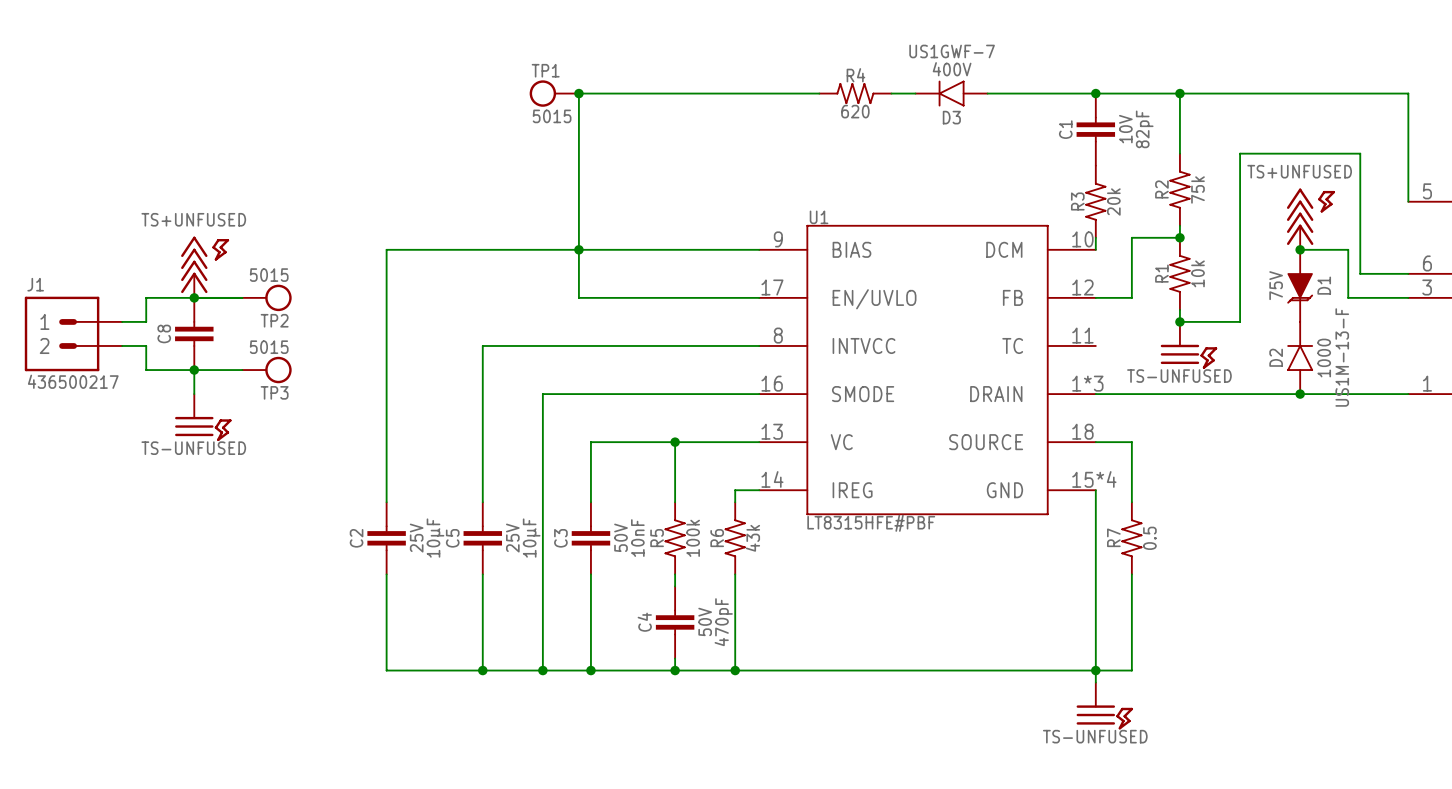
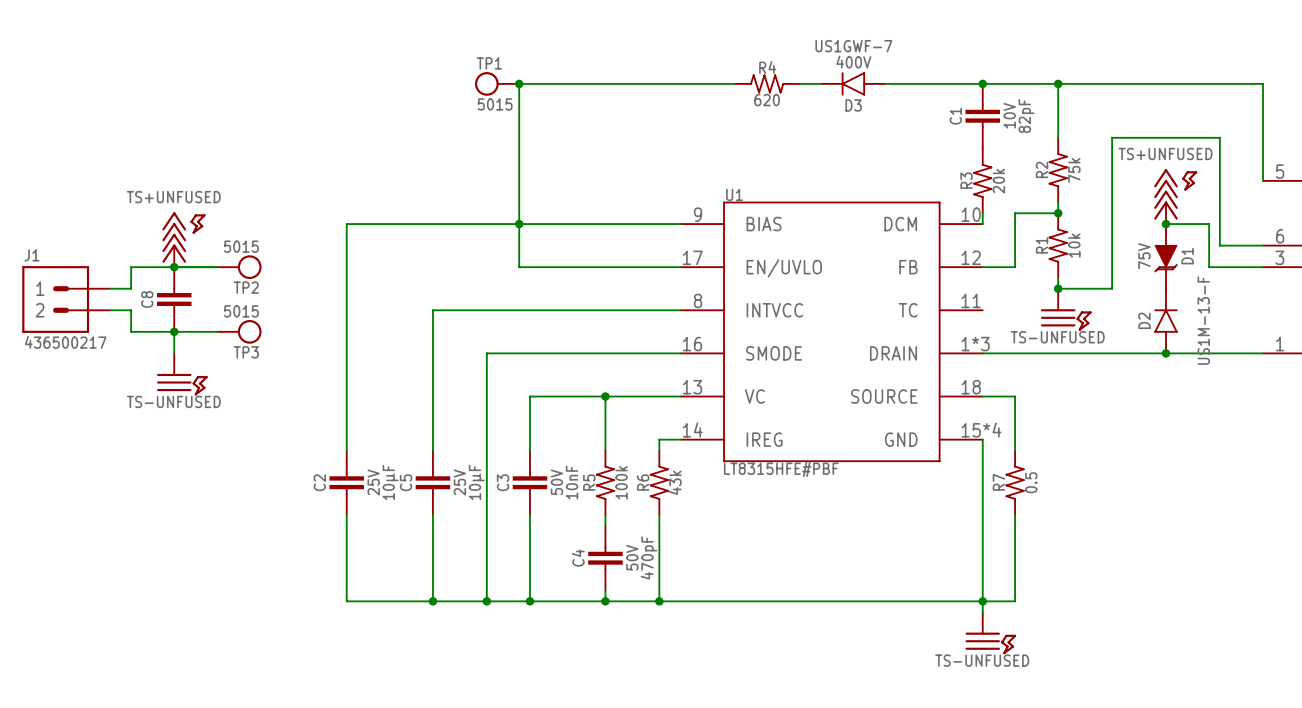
D2 text: 1000 (1324, 358) -> none

